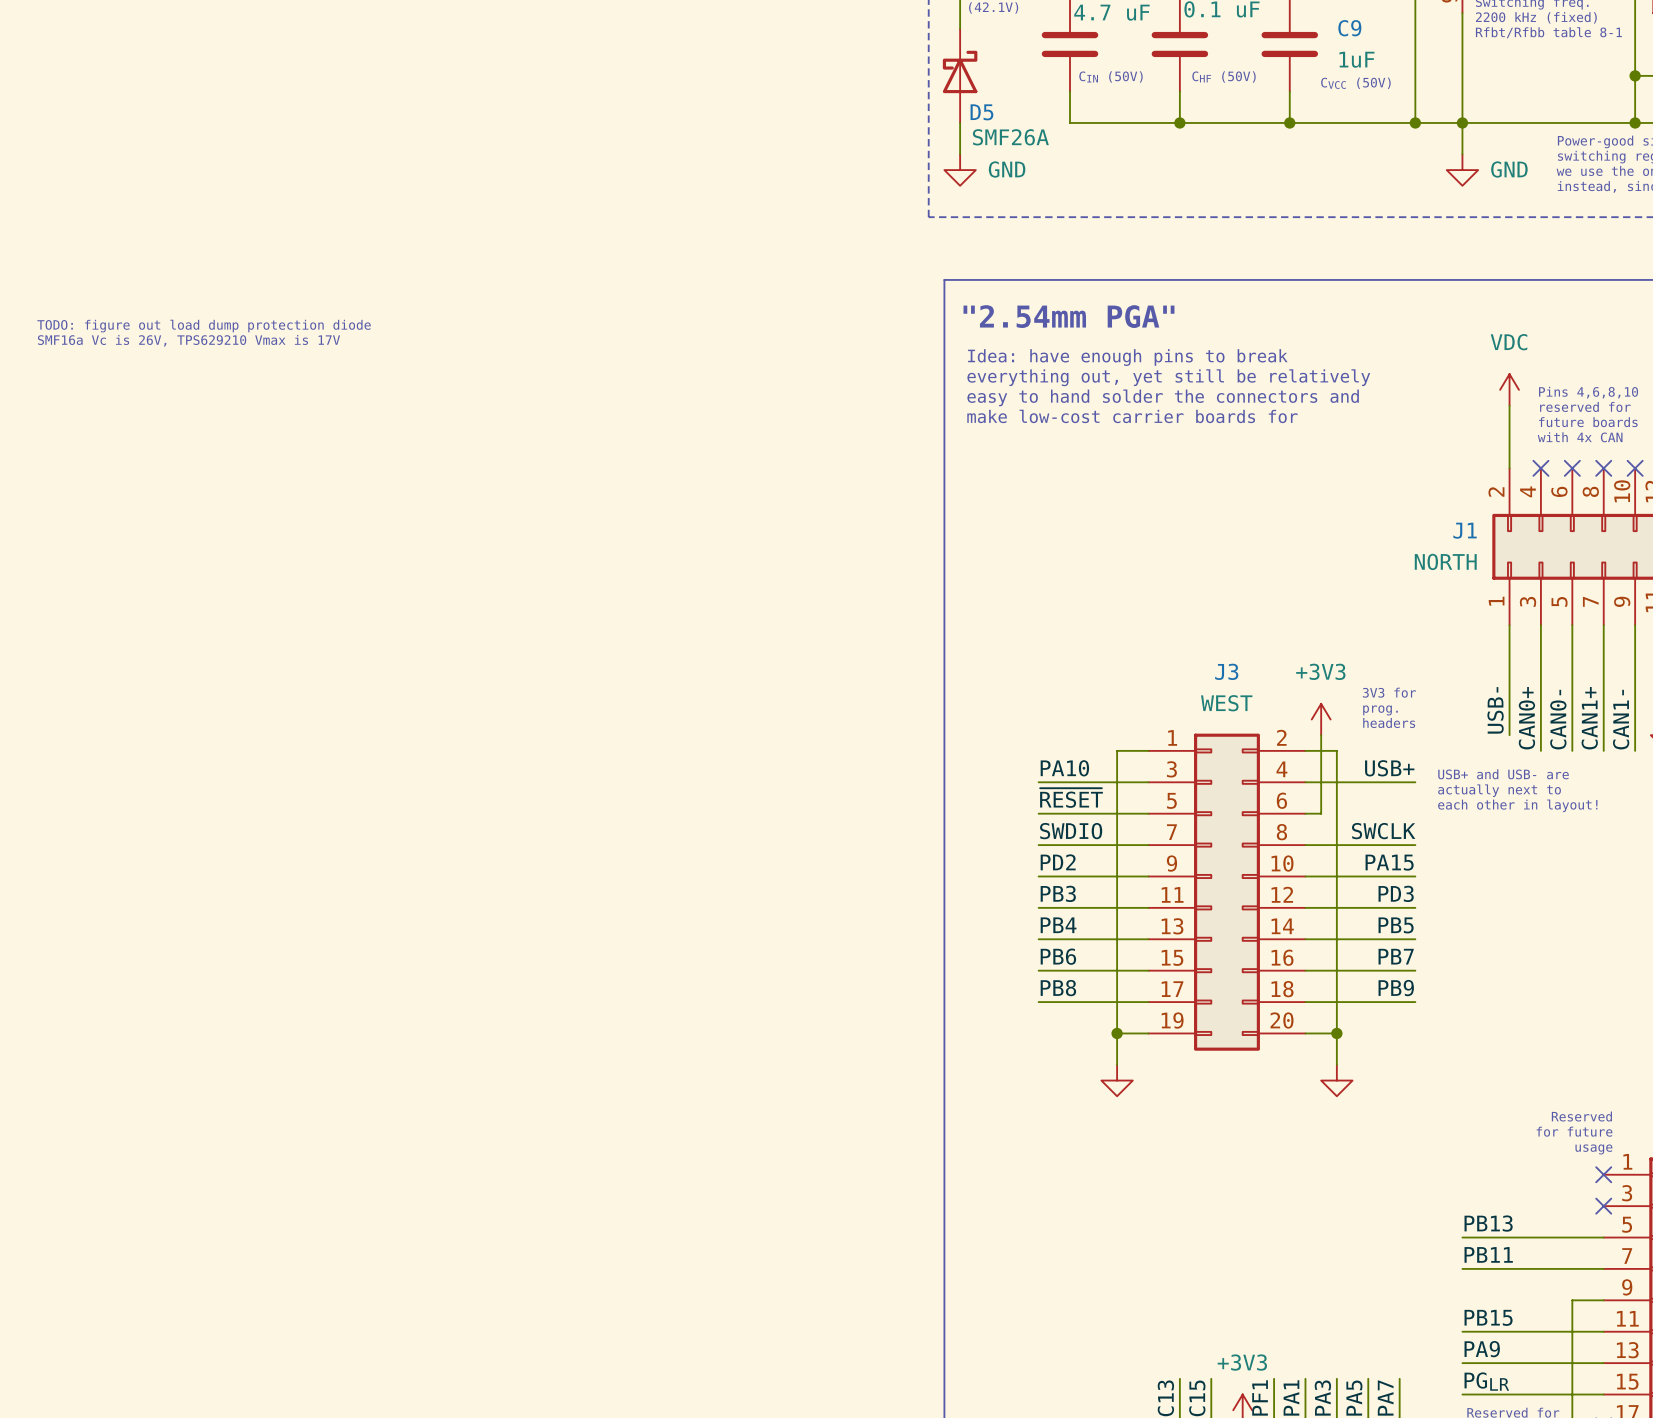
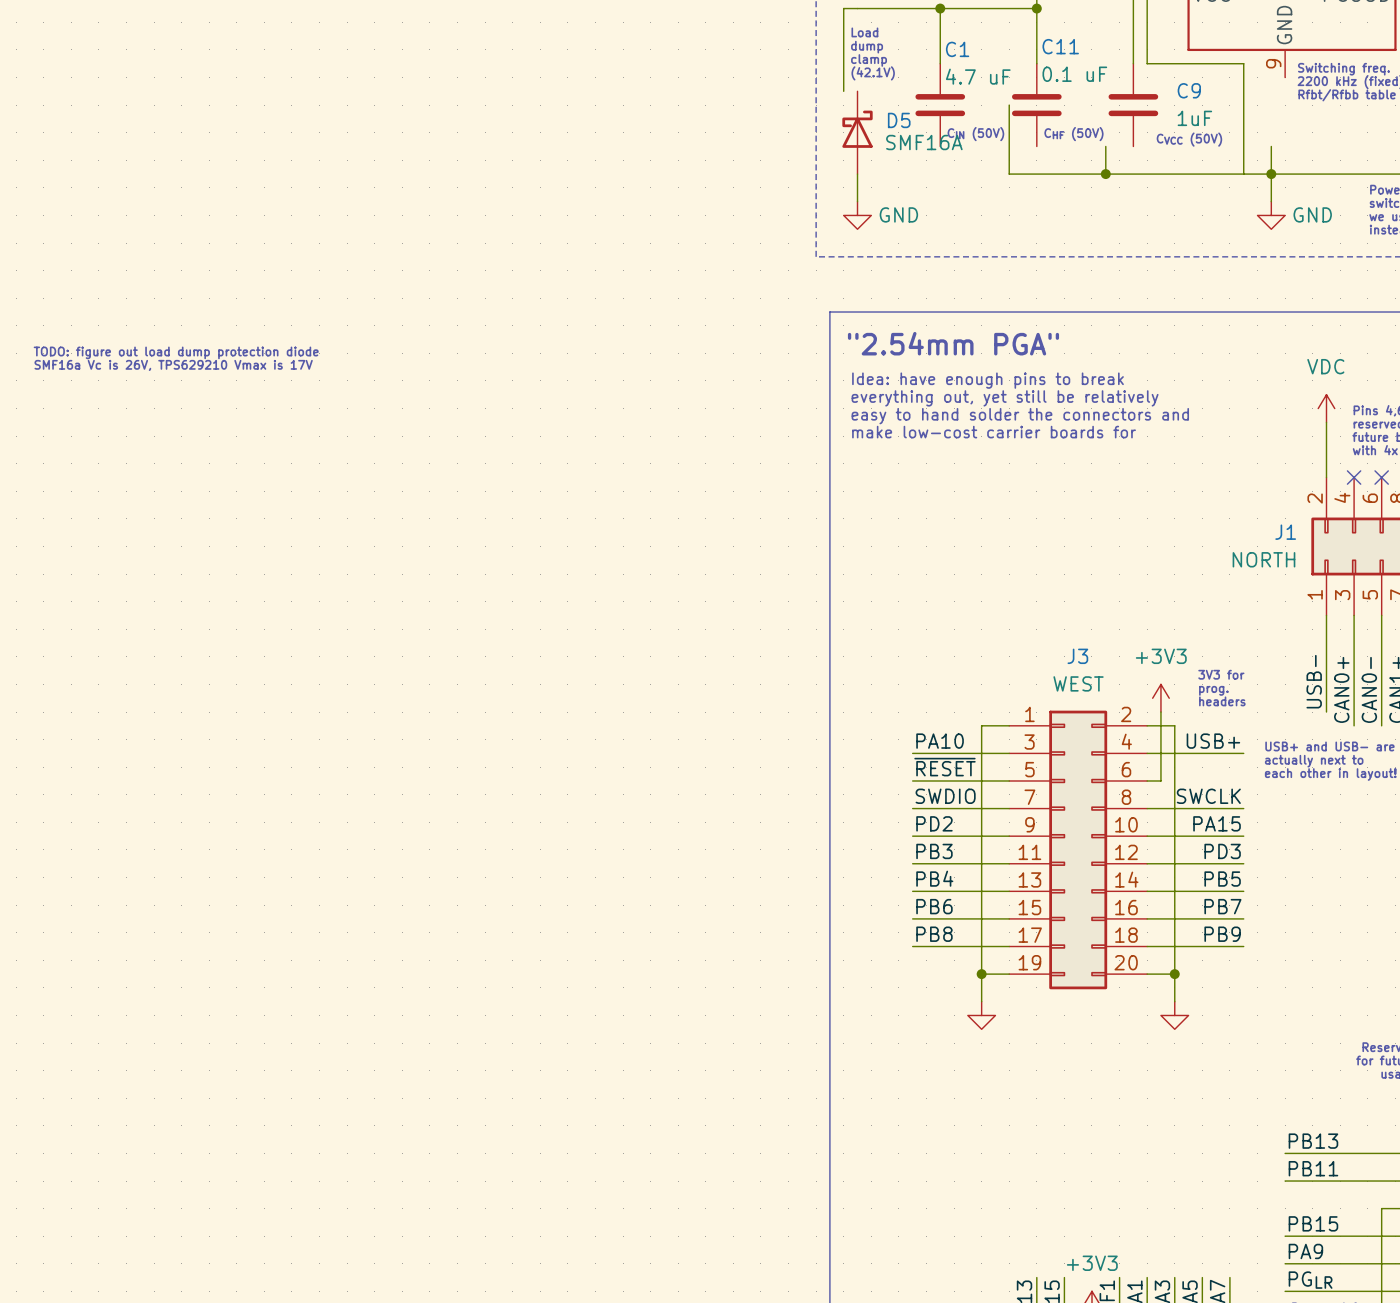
wire: (1462, 13) (1462, 154) -> none
D5 position: (960, 75) -> (857, 132)
wire: (1070, 91) (1070, 122) (1148, 122) -> (1009, 105) (1009, 174)
wire: (1179, 91) (1179, 122) -> none
wire: (1289, 91) (1289, 122) -> (1105, 146) (1105, 174)
wire: none -> (1271, 146) (1271, 201)
D5 name position: D5 (981, 112) -> D5 (899, 120)
wire: (960, 122) (960, 154) -> (857, 174) (857, 201)
junction: (1179, 122) -> none
junction position: (1289, 122) -> (1105, 174)
junction: (1415, 122) -> none
junction: none -> (1271, 174)
junction: (1462, 122) -> none
D5 value: SMF26A (1010, 137) -> SMF16A (924, 142)
power symbol position: GND (960, 170) -> GND (857, 215)
power symbol position: GND (1462, 170) -> GND (1271, 215)

